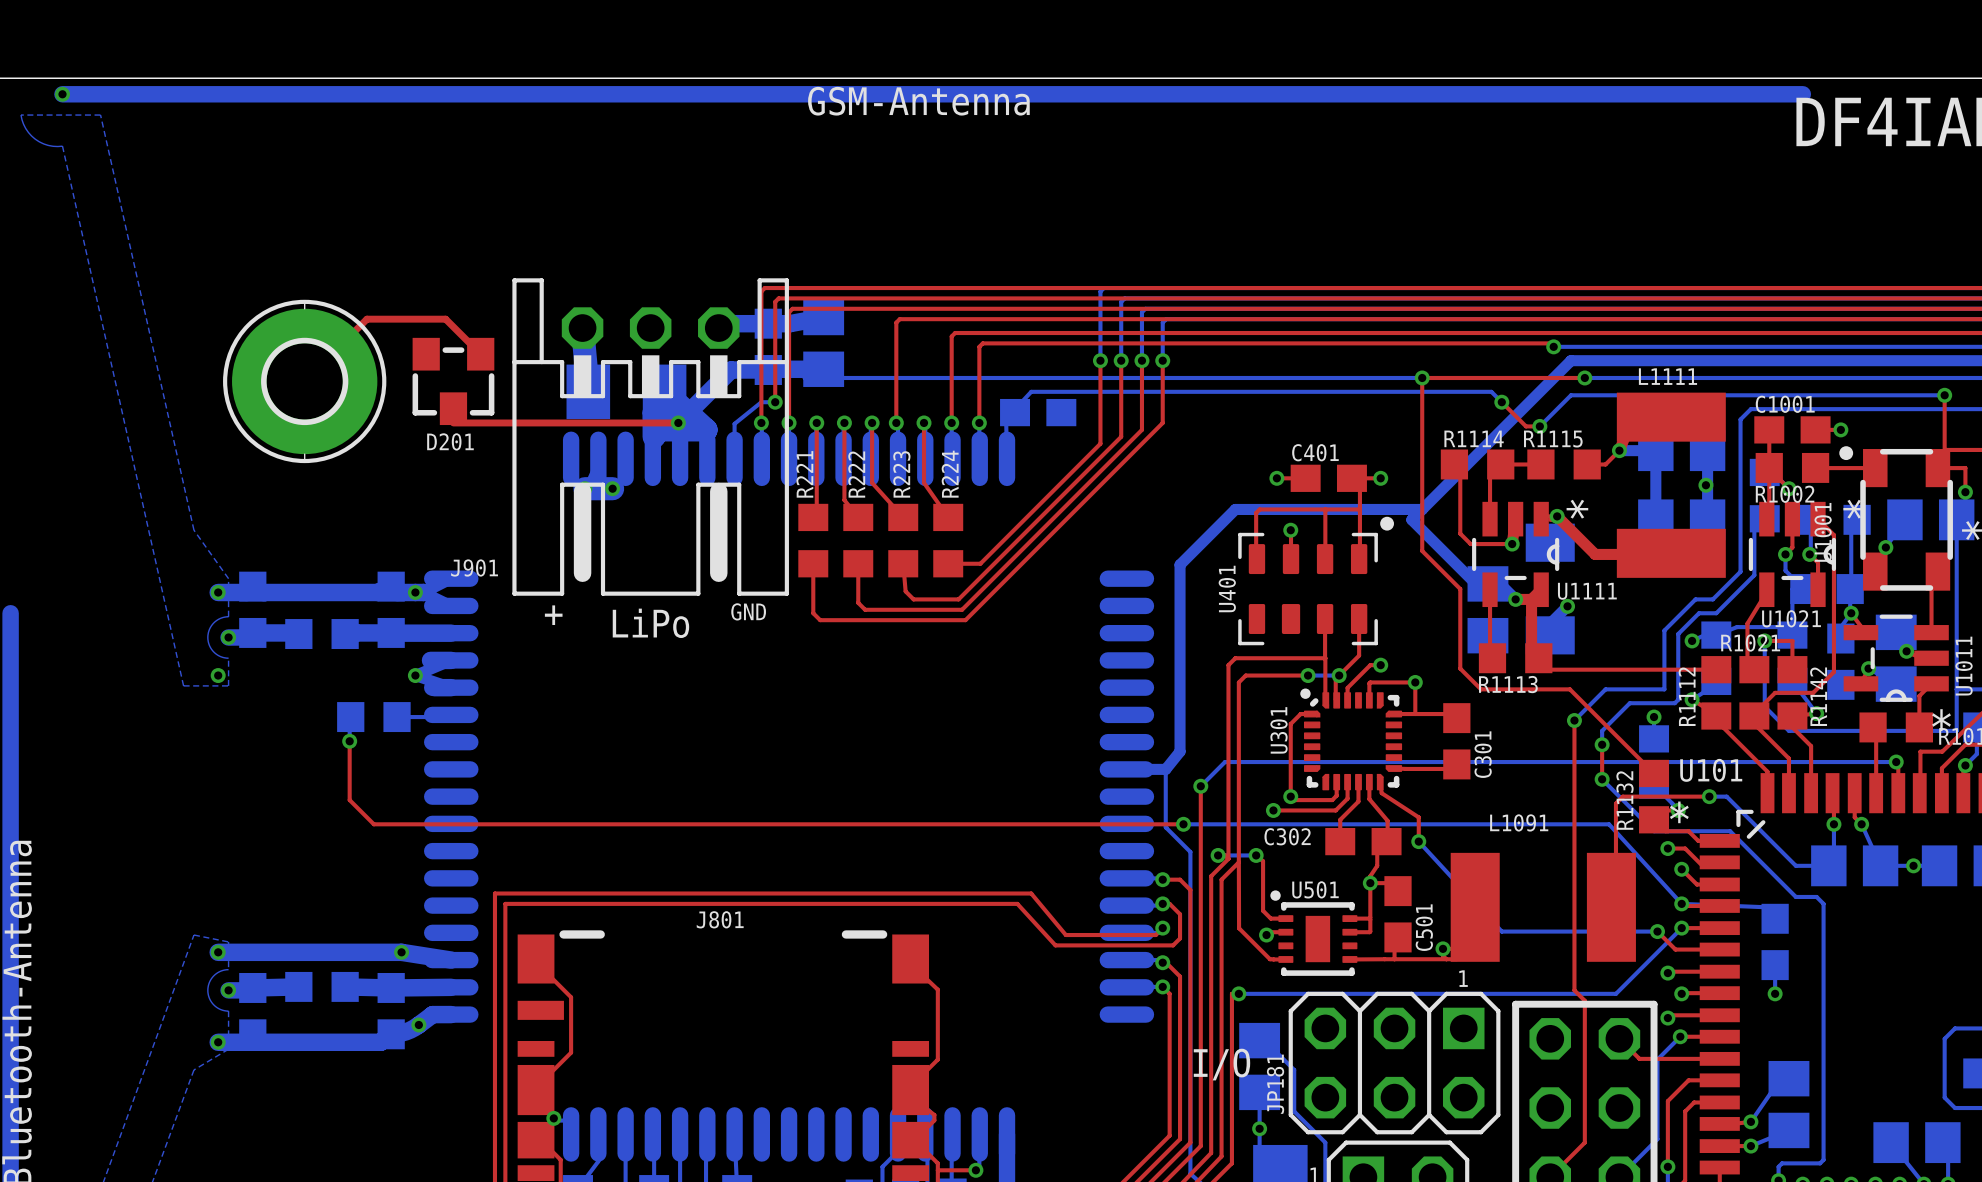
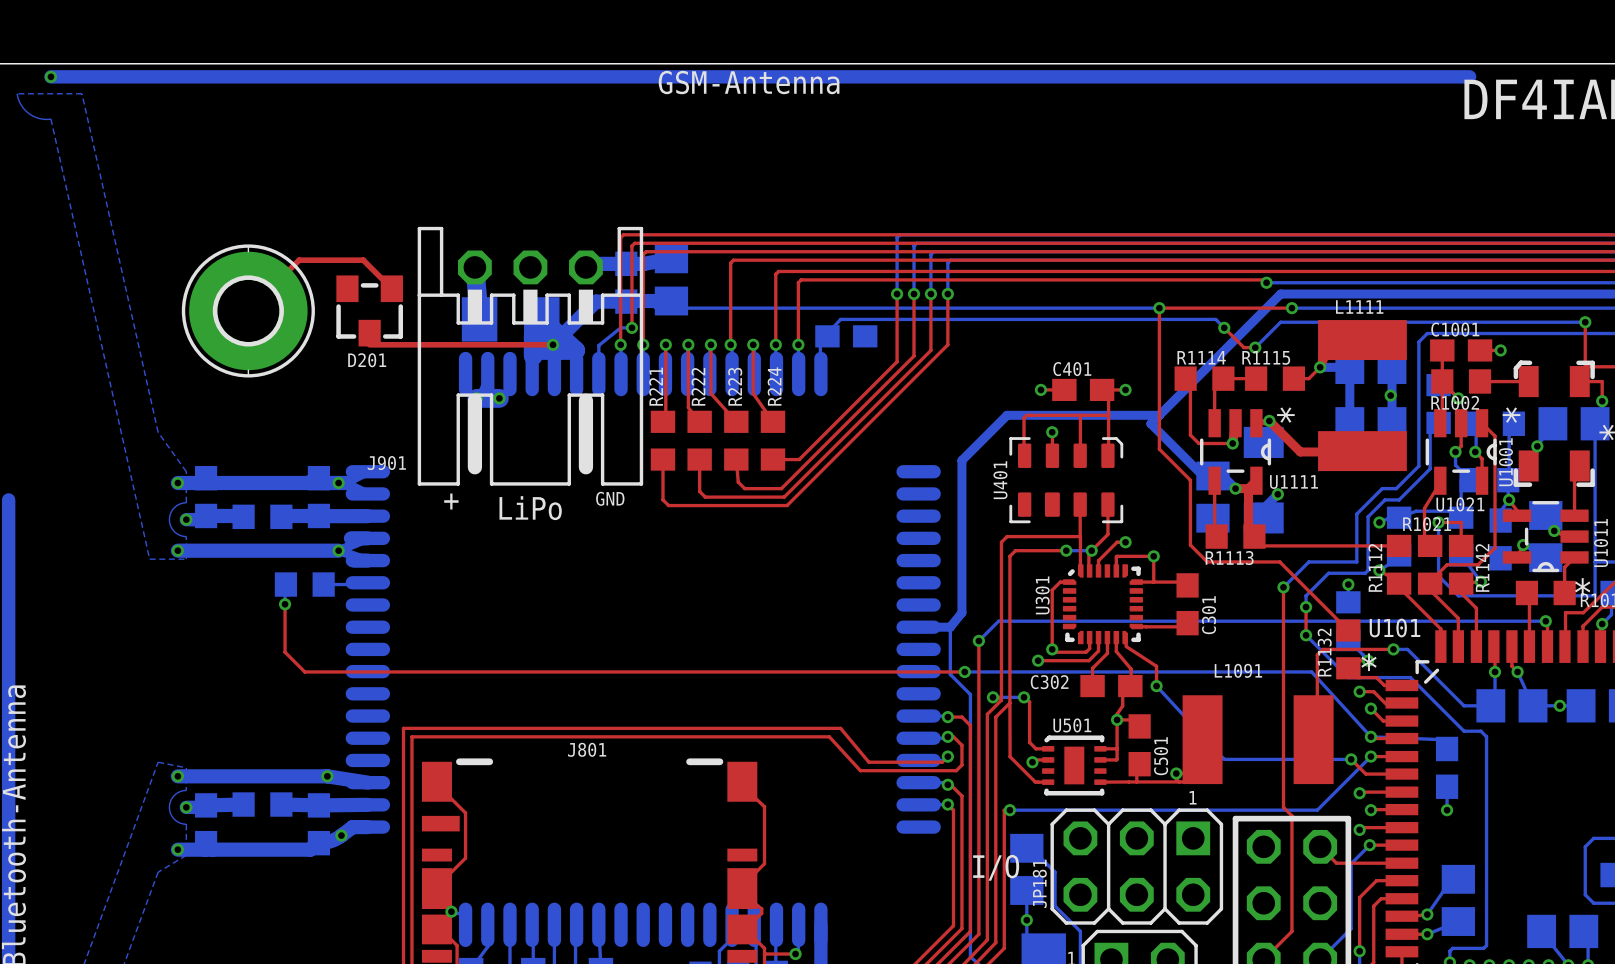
U1001 footprint: [1839, 446, 1953, 591] -> [1513, 360, 1595, 487]
U401 footprint: [1238, 516, 1395, 646] -> [1009, 437, 1124, 524]
bottom track: none -> (177, 550) (338, 550)
U301 footprint: [1300, 688, 1403, 791] -> [1063, 564, 1143, 645]
U501 footprint: [1270, 890, 1358, 976] -> [1042, 735, 1107, 796]

